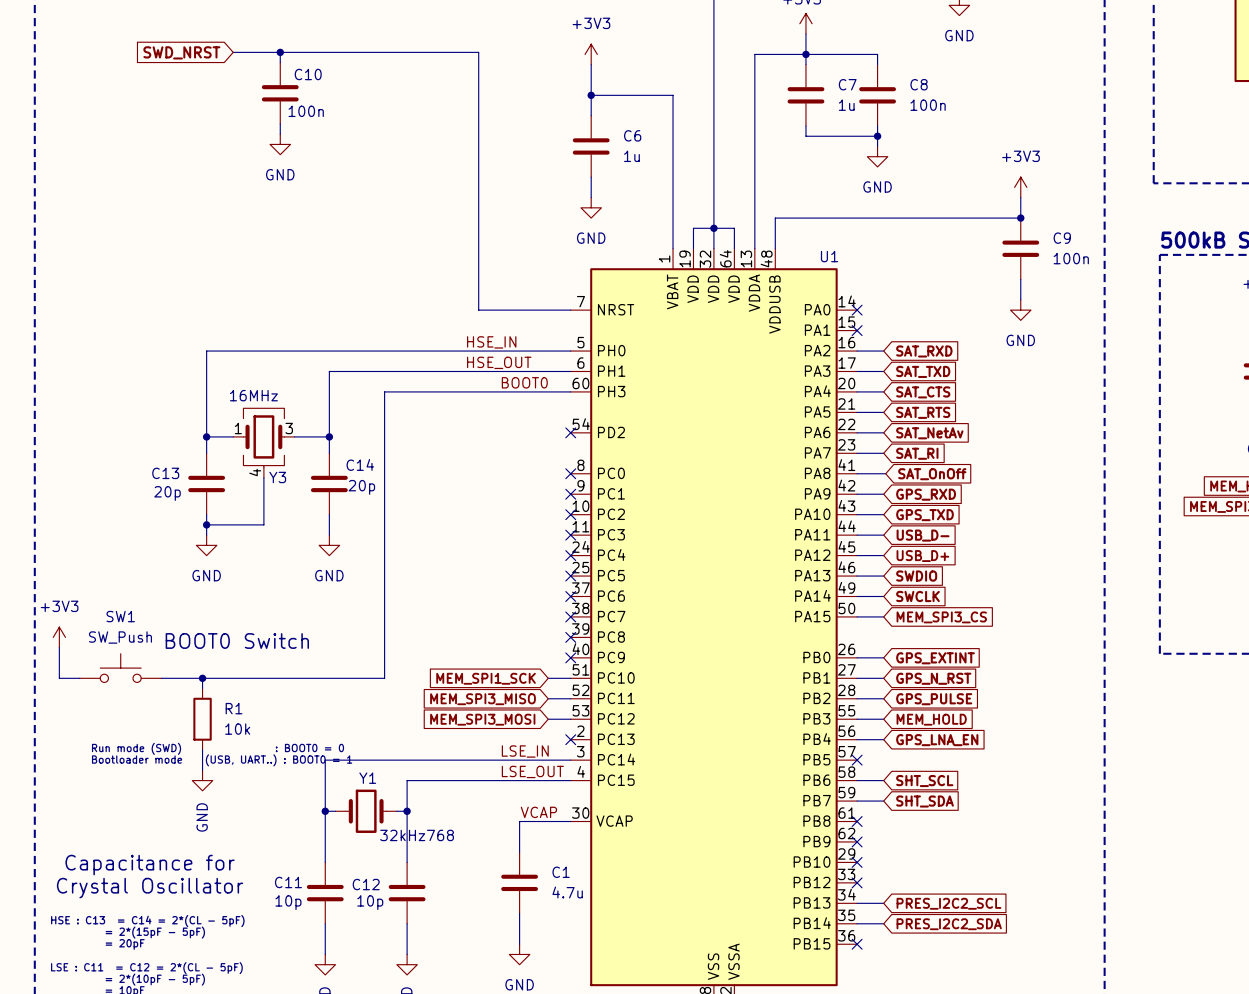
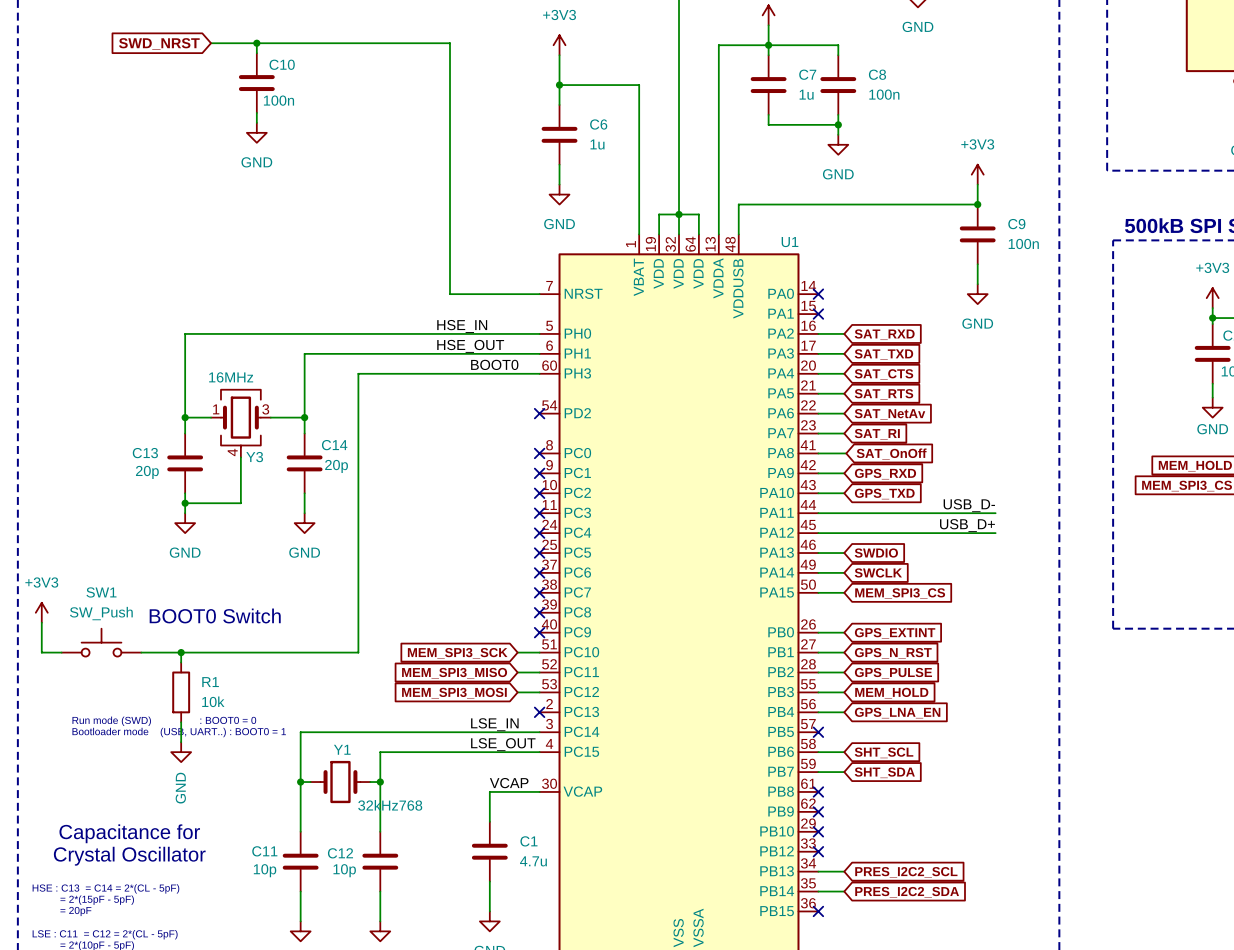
label: none -> USB_D- (969, 505)
wire: none -> (844, 513) (995, 513)
global label: USB_D- (923, 535) -> none
label: none -> USB_D+ (967, 525)
wire: none -> (844, 533) (995, 533)
global label: USB_D+ (922, 556) -> none
global label: MEM_SPI1_SCK (486, 678) -> MEM_SPI3_SCK (457, 653)

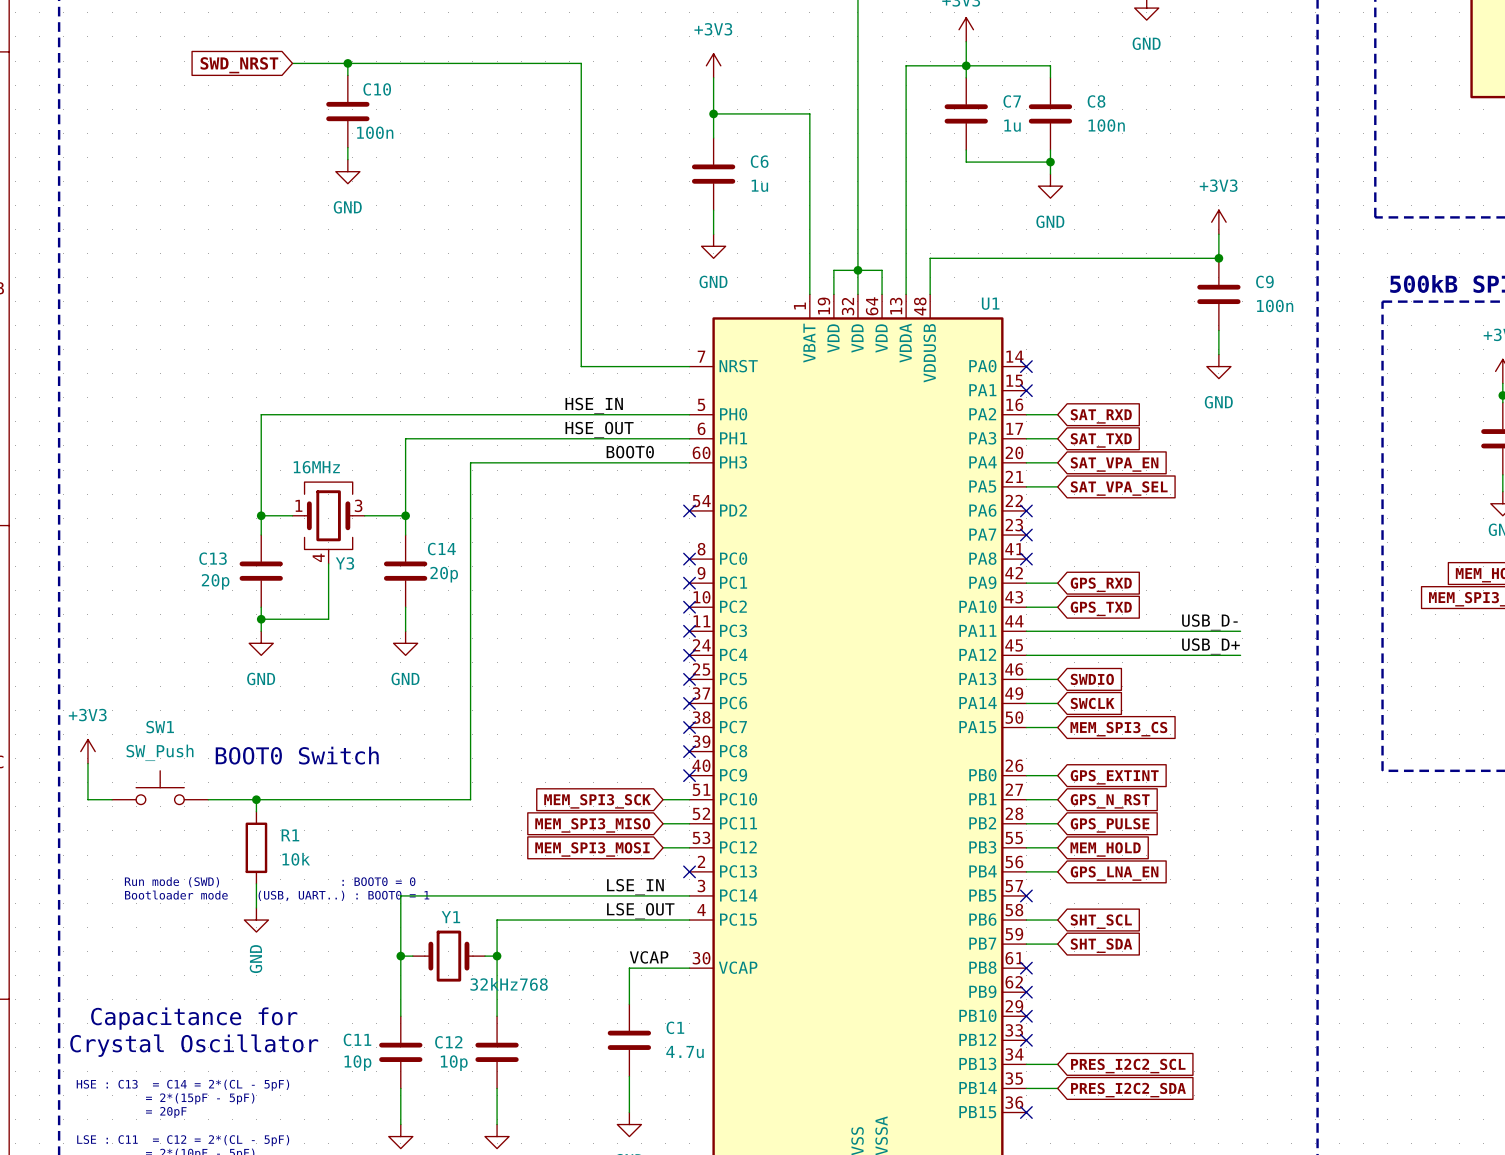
global label: SAT_CTS (883, 374) -> SAT_VPA_EN (1114, 464)
global label: SAT_RTS (883, 394) -> SAT_VPA_SEL (1119, 488)
wire: (818, 413) (844, 413) -> none
no-connect mark: none -> (1026, 510)
global label: SAT_NetAv (889, 414) -> none
wire: (818, 433) (844, 433) -> none
no-connect mark: none -> (1026, 535)
global label: SAT_RI (877, 434) -> none
wire: (818, 453) (846, 453) -> none
no-connect mark: none -> (1026, 559)
global label: SAT_OnOff (891, 454) -> none

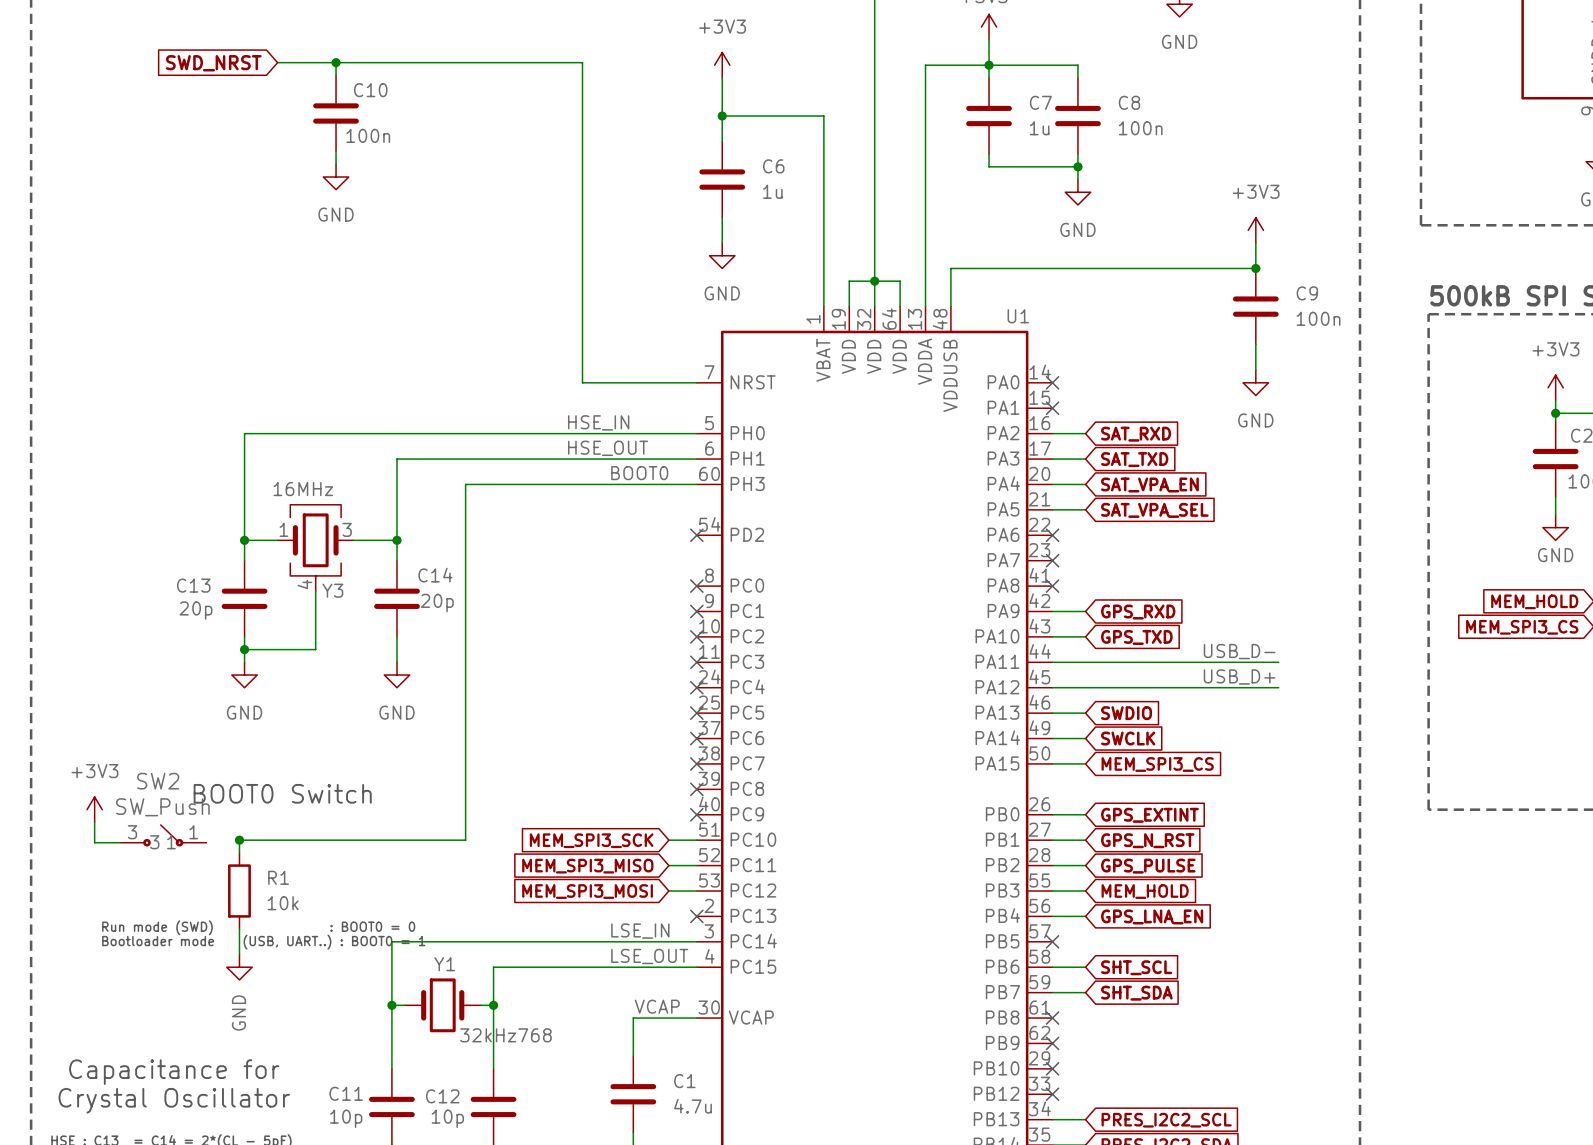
power symbol position: +3V3 (87, 751) -> +3V3 (94, 809)
wire: (87, 763) (87, 799) (112, 799) -> none
wire: none -> (94, 822) (94, 842) (120, 842)
SW1: SW_Push (160, 787) -> none
SW2: none -> SW_Push (163, 835)
wire: (208, 799) (256, 799) -> none

